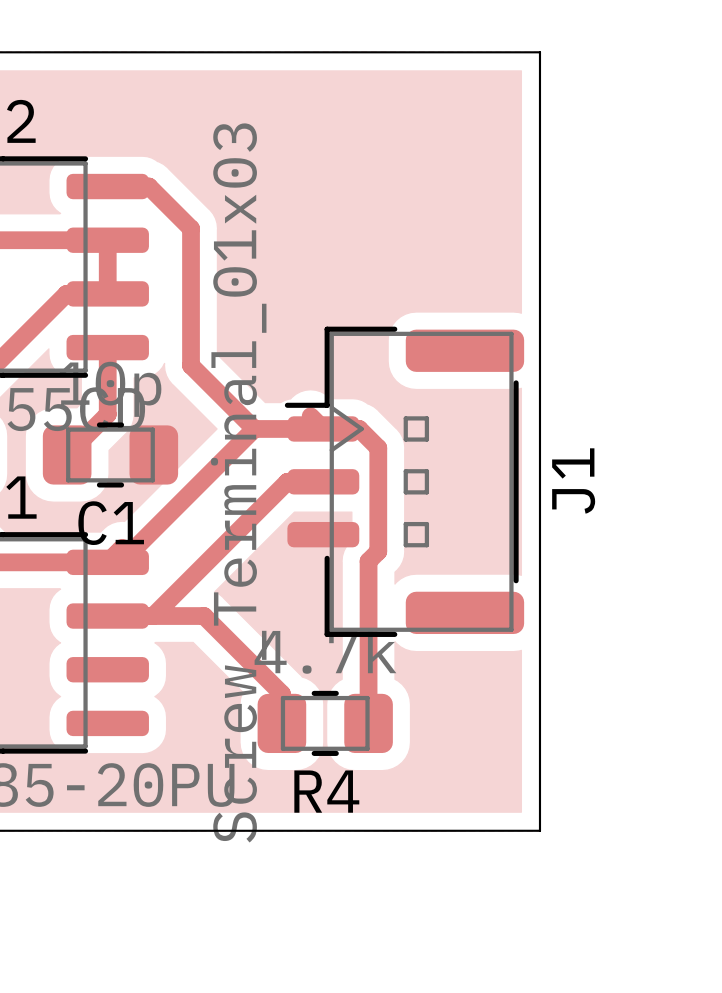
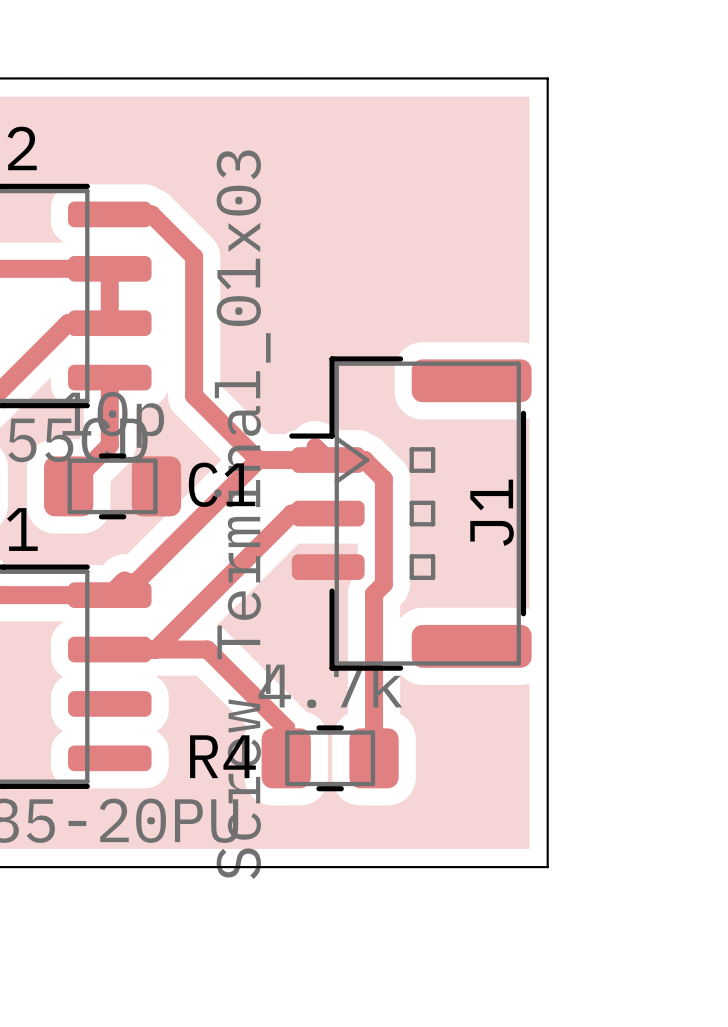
J1 name position: J1 (573, 480) -> J1 (492, 512)
C1 name position: C1 (111, 523) -> C1 (222, 484)
R4 name position: R4 (326, 791) -> R4 (222, 756)

